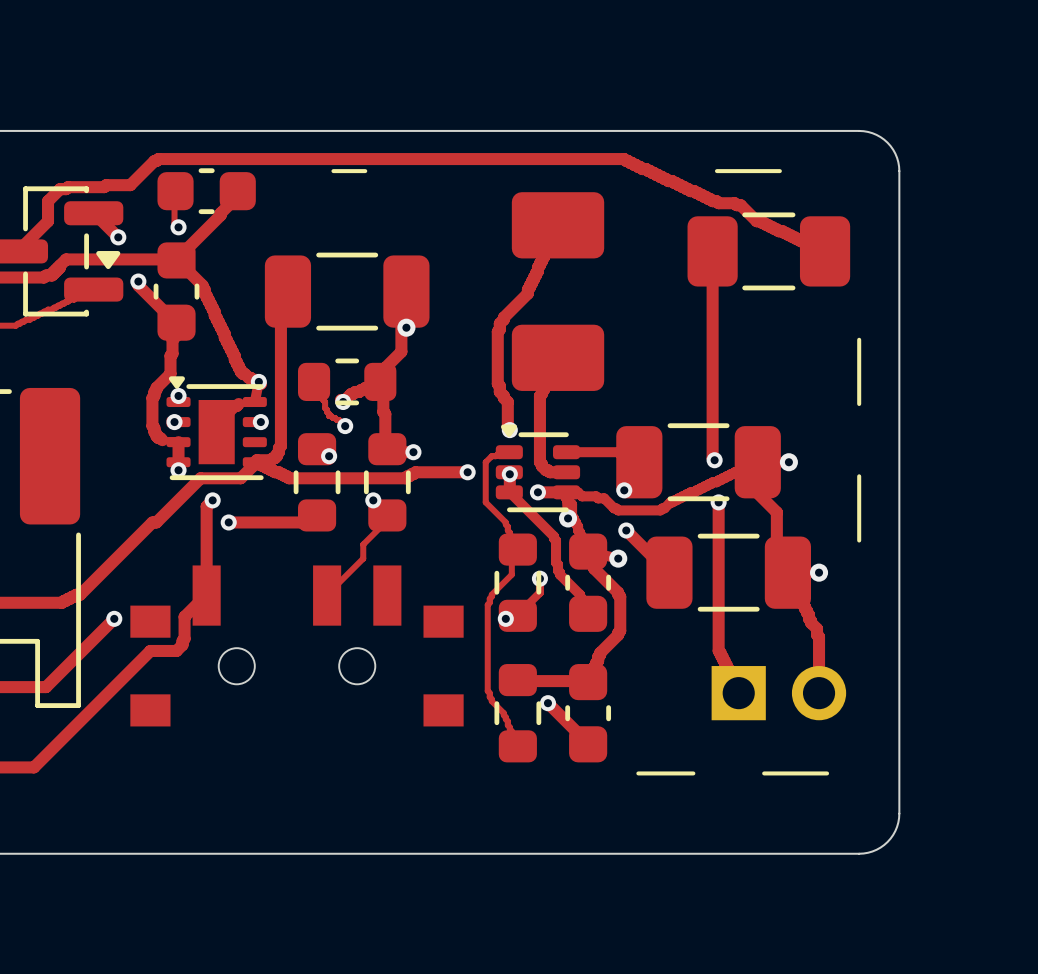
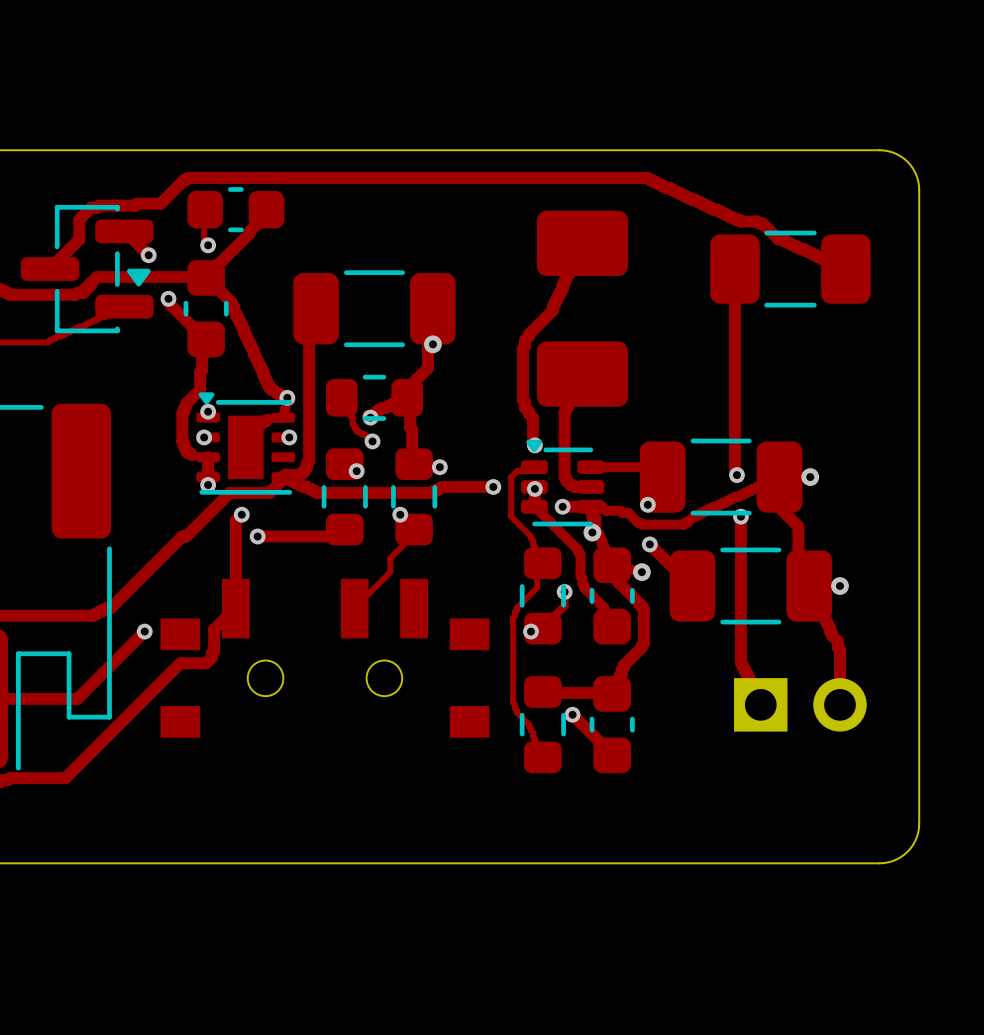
line: (333, 171) (365, 171) -> none
line: (716, 171) (779, 171) -> none
line: (859, 339) (859, 404) -> none
line: (859, 476) (859, 540) -> none
line: (638, 773) (693, 773) -> none
line: (764, 773) (827, 773) -> none

